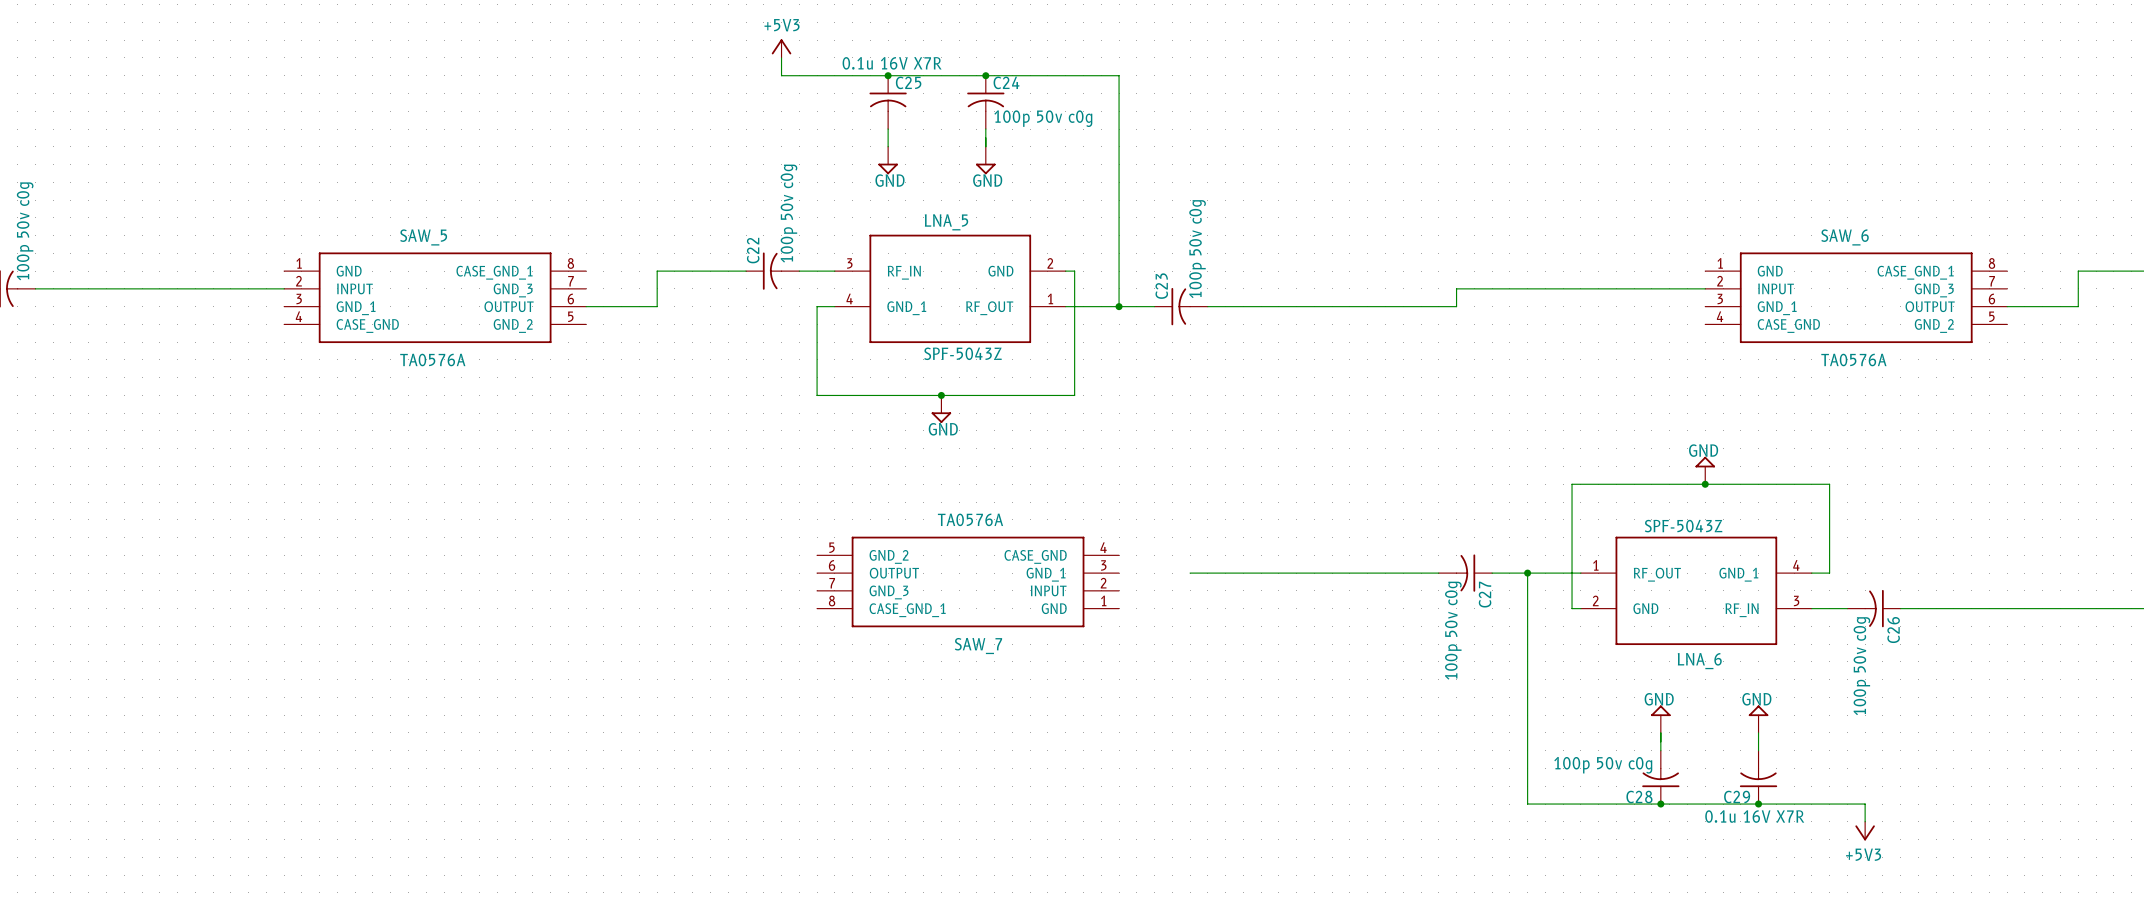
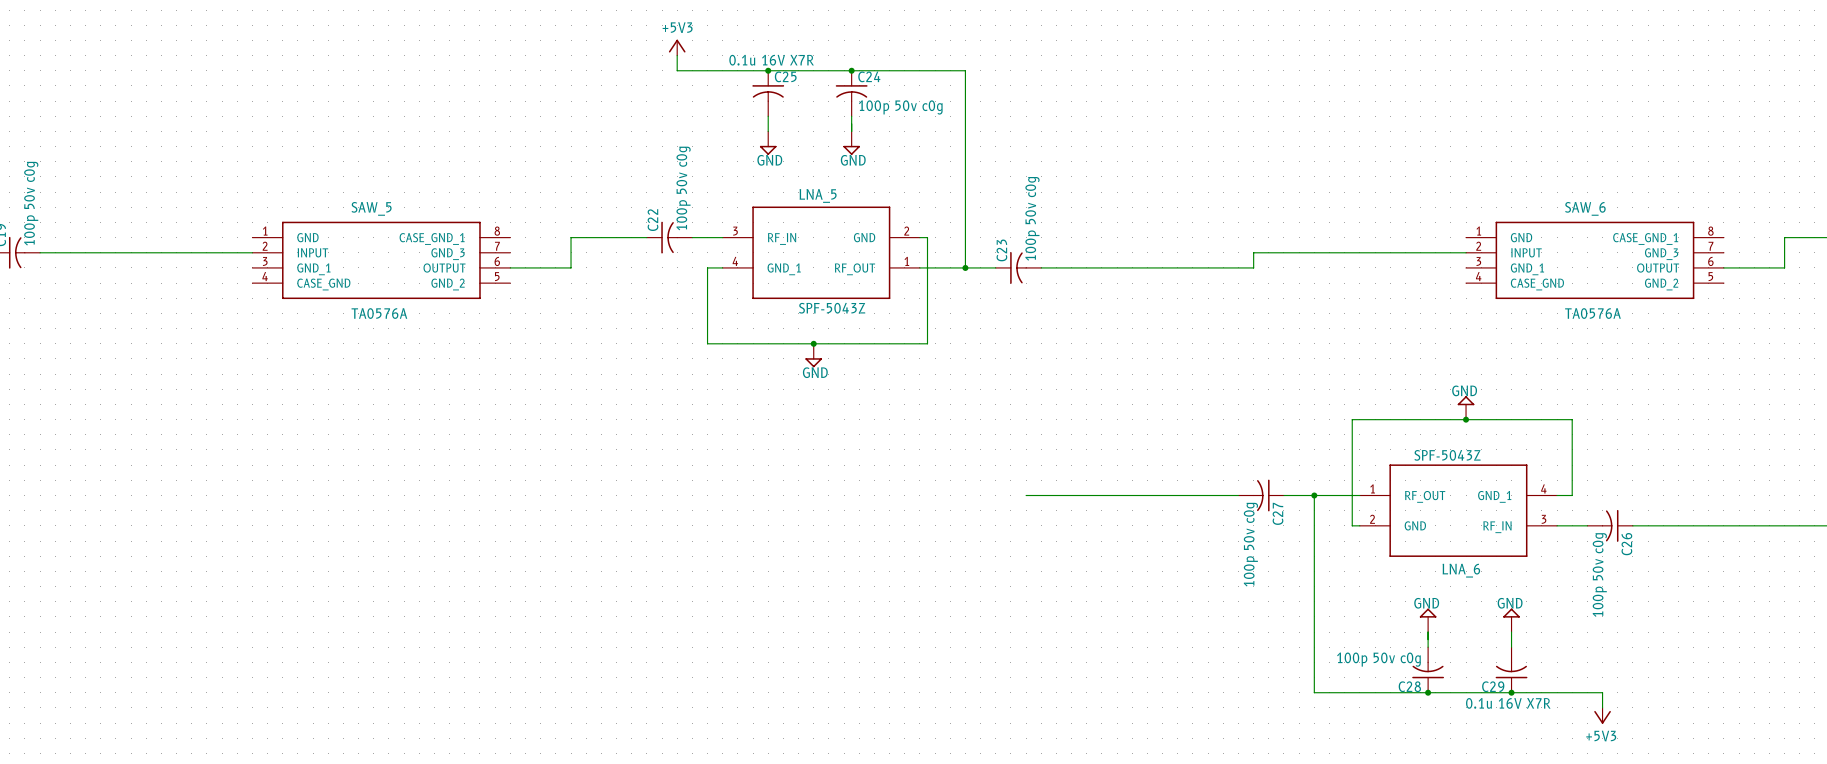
SAW_7: TA0576A (968, 581) -> none

